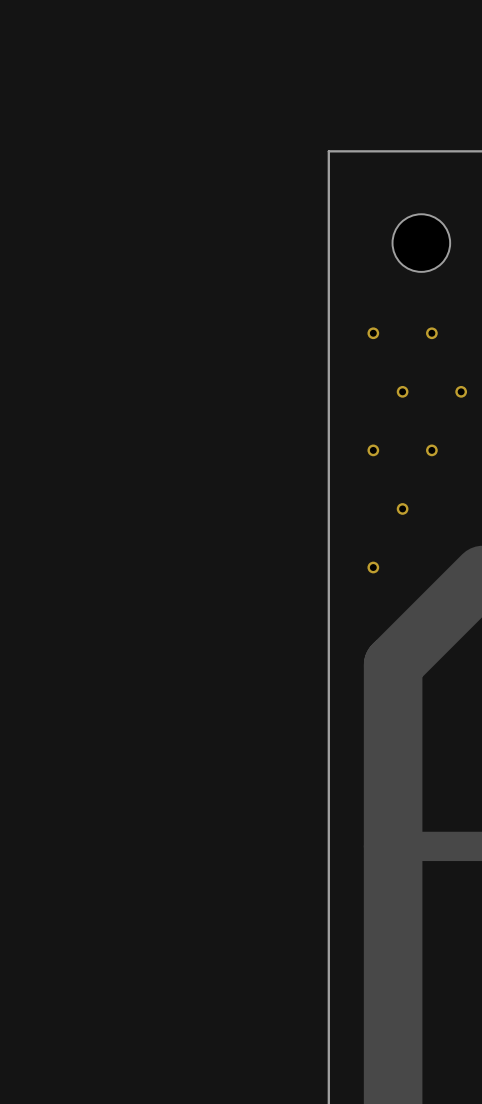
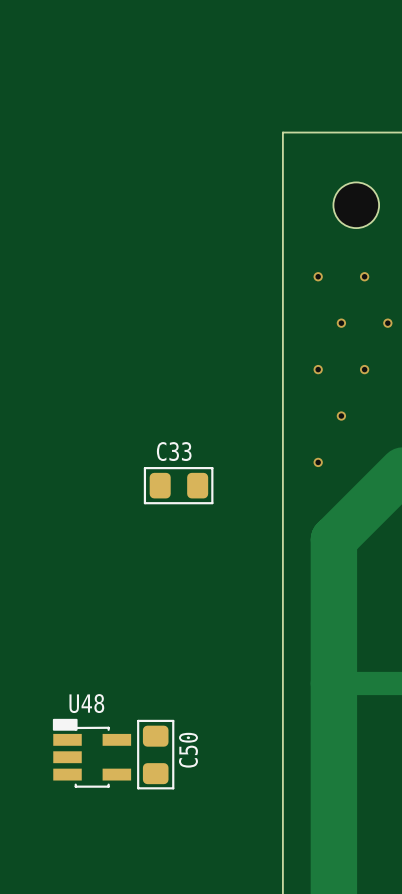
C33: none -> (178, 485)
U48: none -> (92, 753)
C50: none -> (155, 754)

